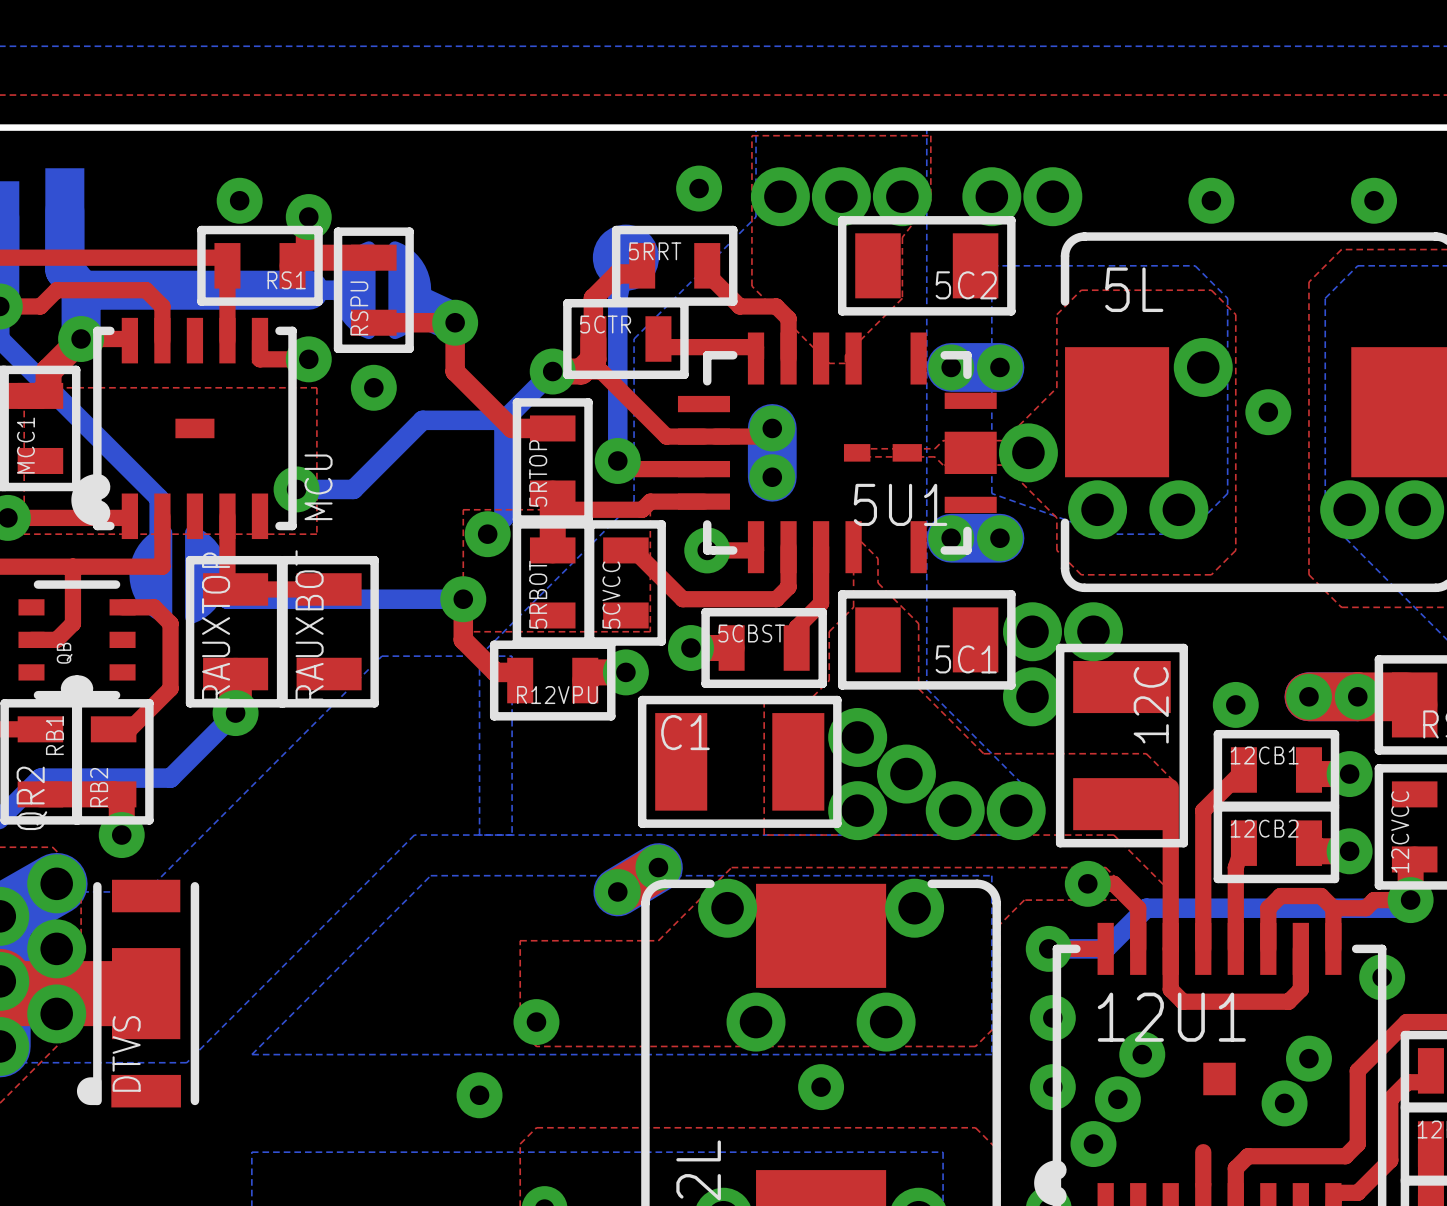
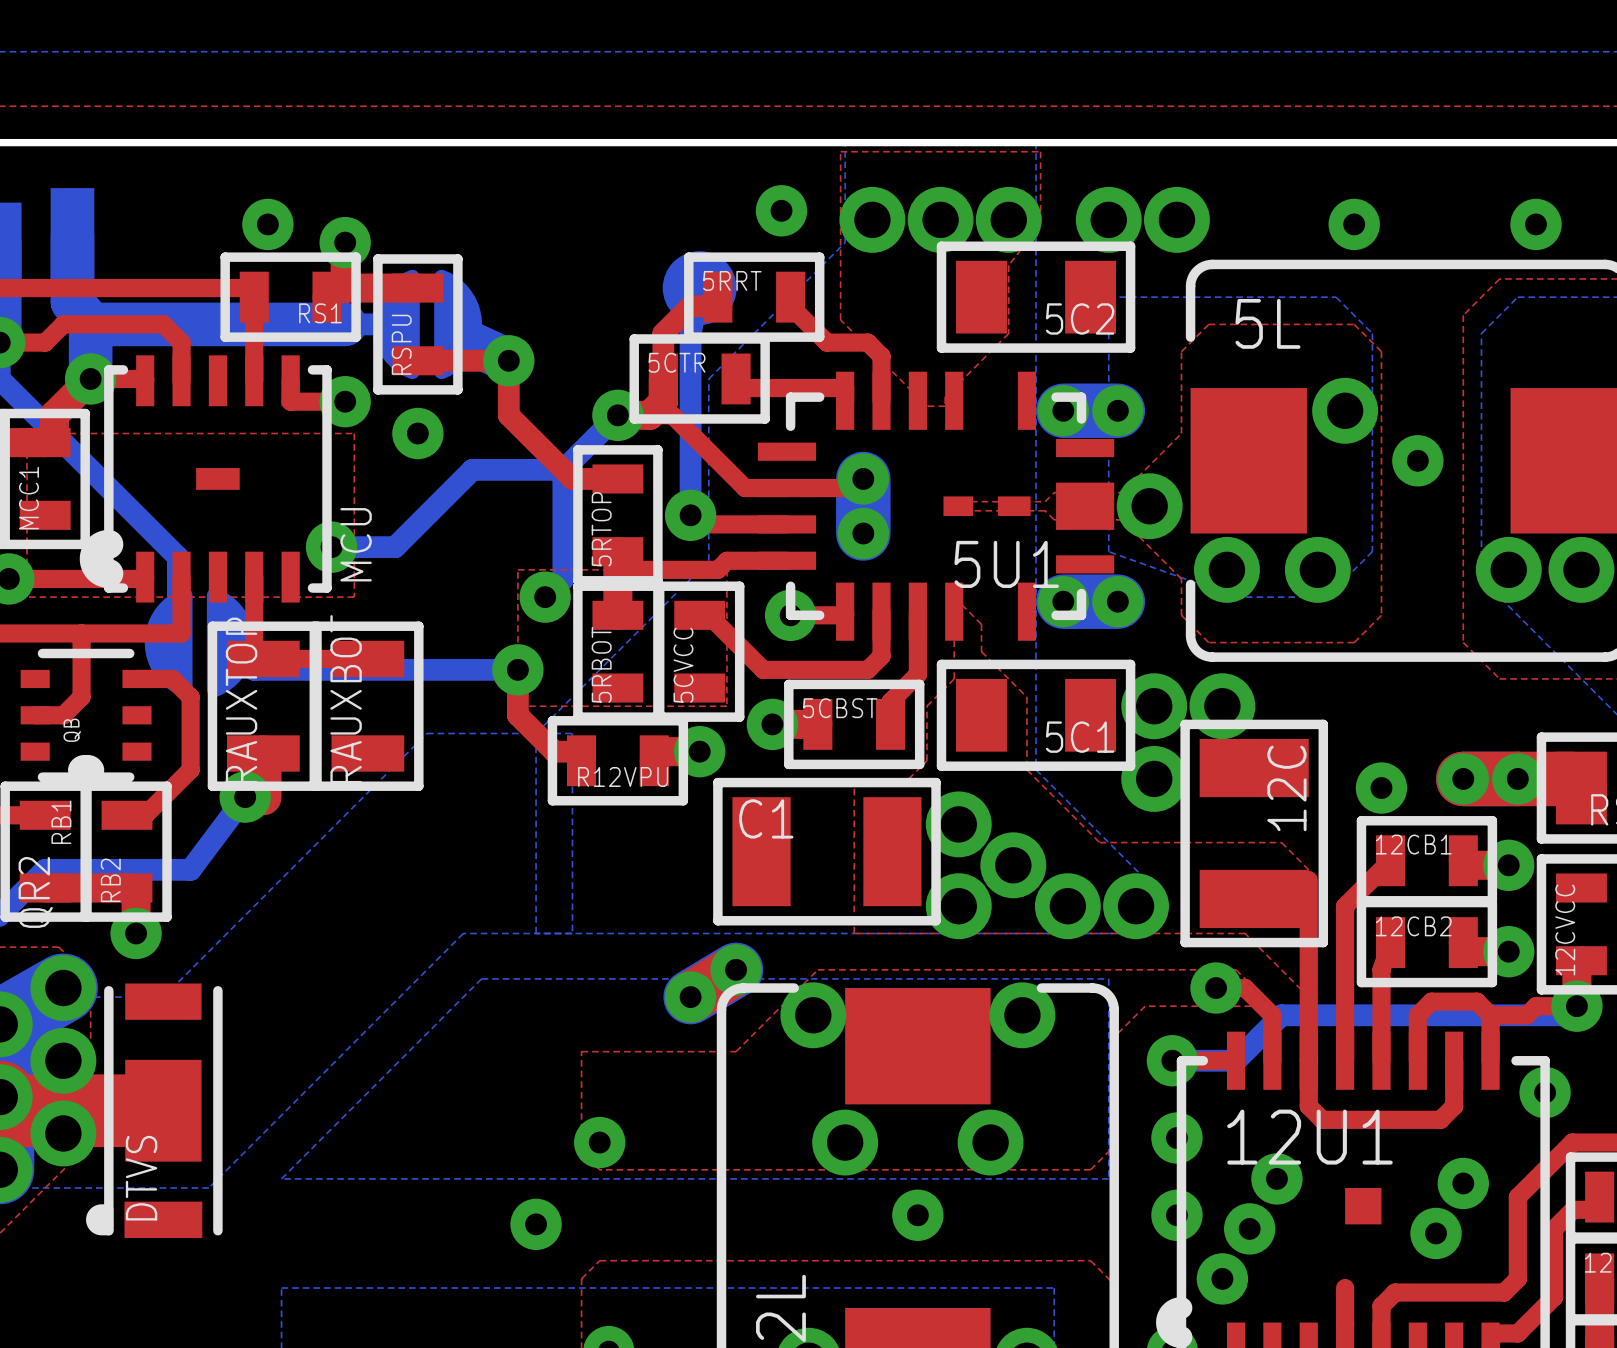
bottom track: (235, 713) (170, 778) -> (245, 797) (190, 869)
via position: (235, 713) -> (245, 797)

